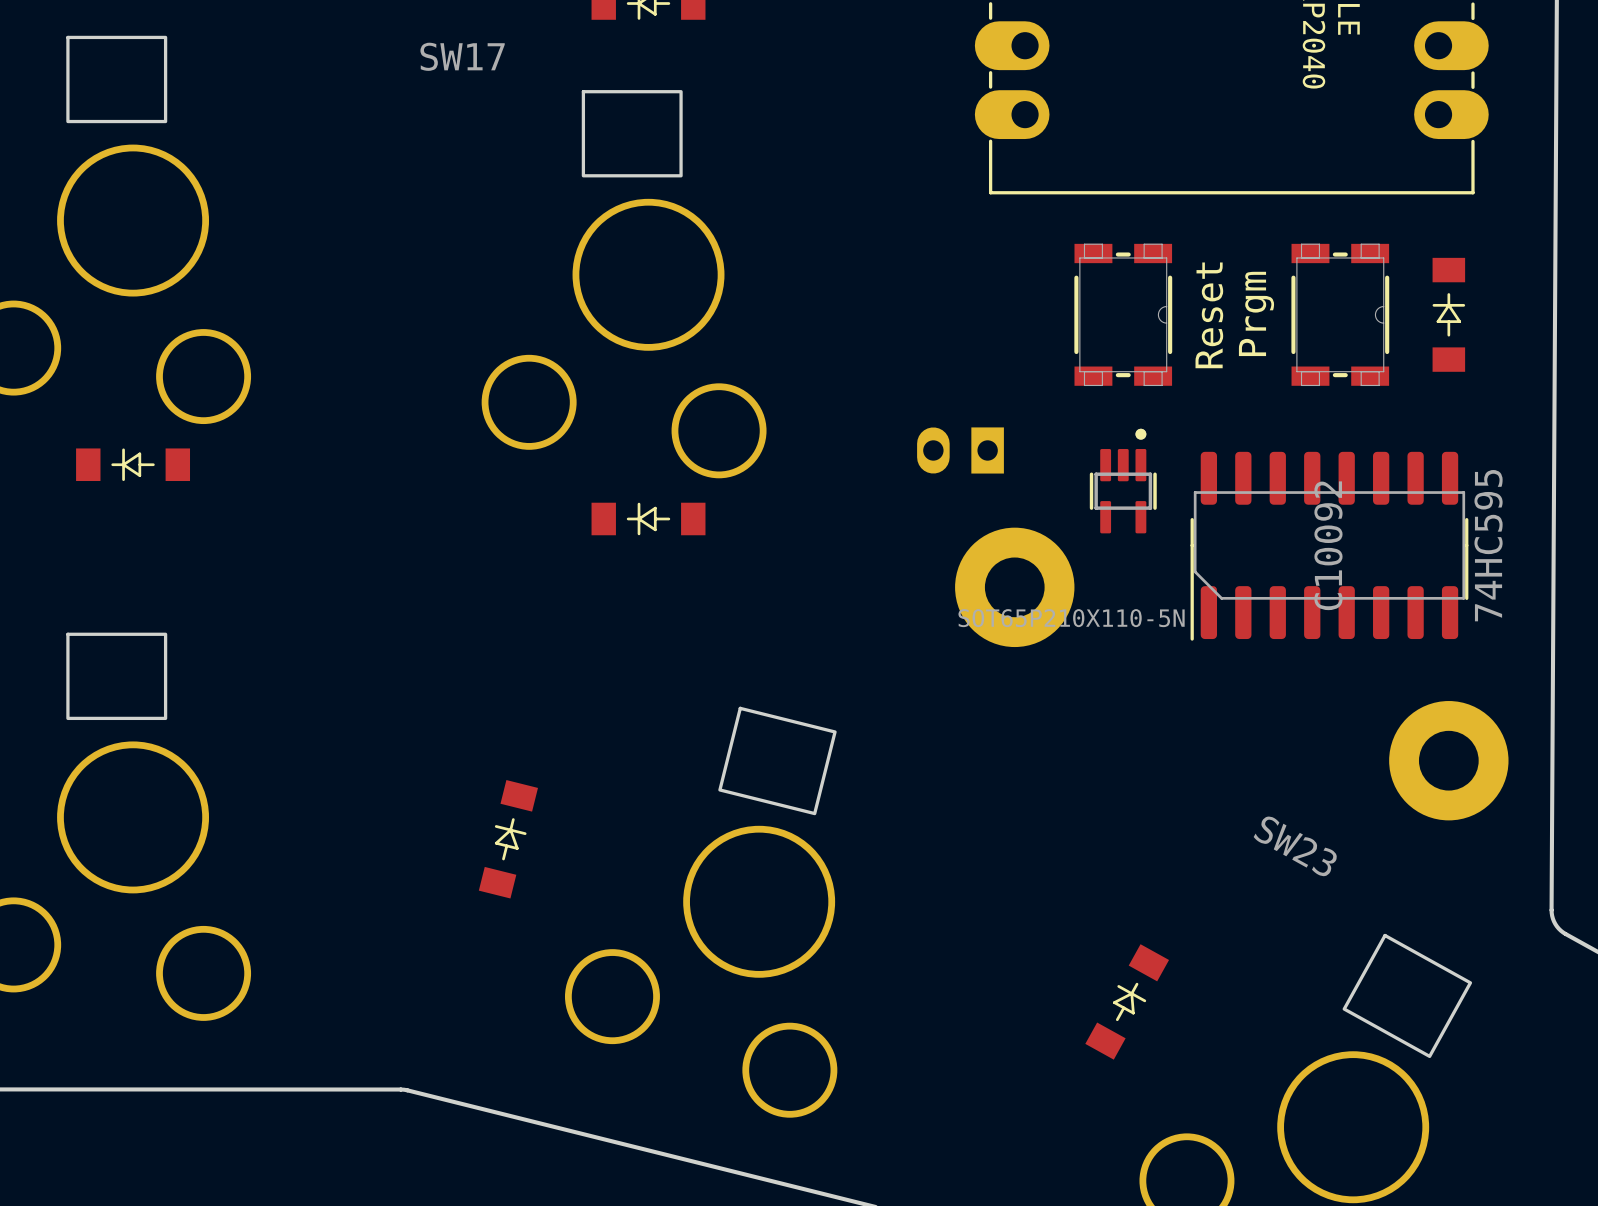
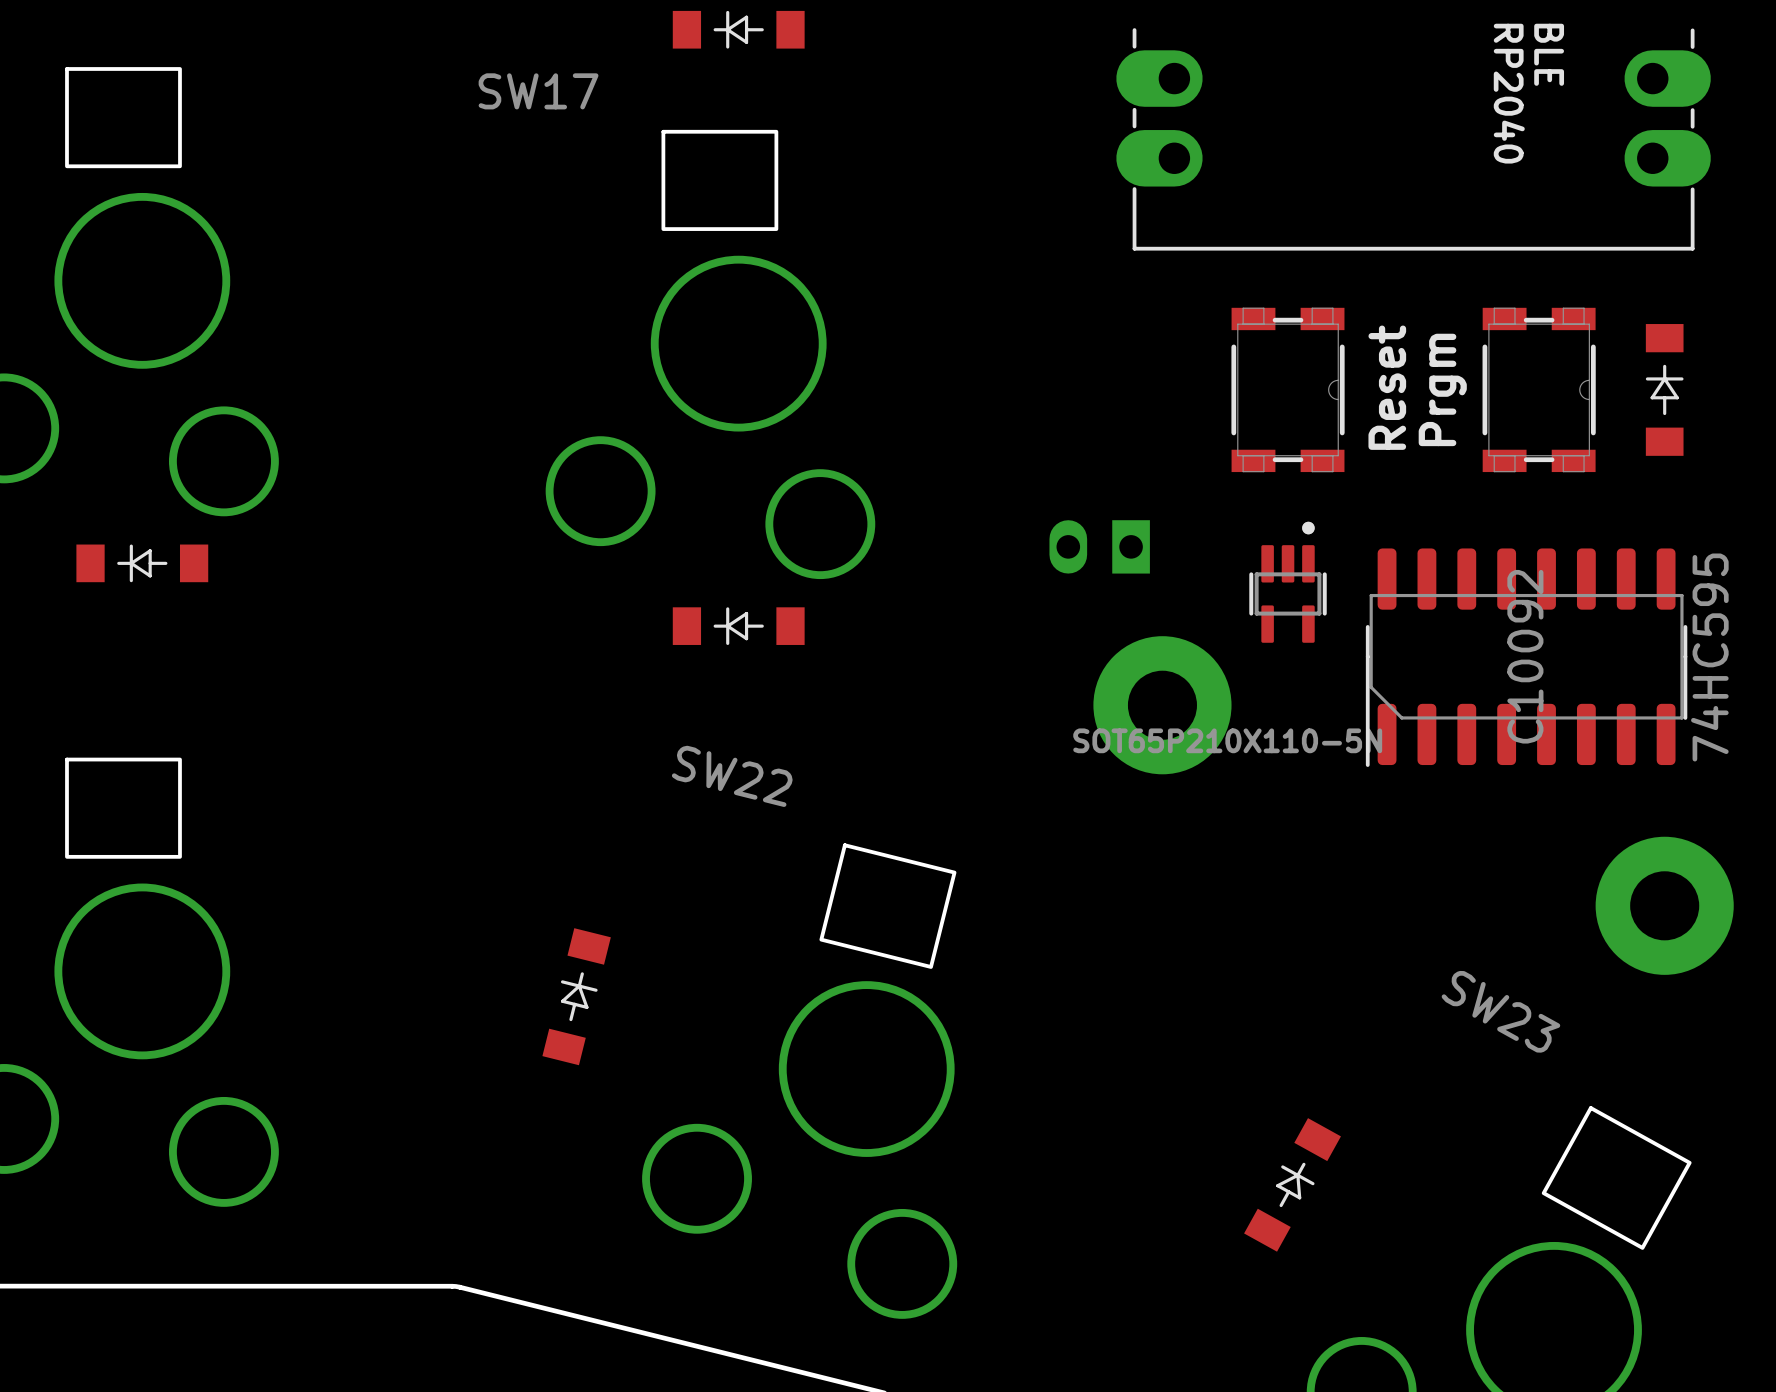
part footprint: [1074, 243, 1173, 386] -> [1231, 307, 1345, 473]
part footprint: [1291, 243, 1390, 386] -> [1482, 307, 1596, 473]
SW22 name: none -> SW22 (732, 776)

